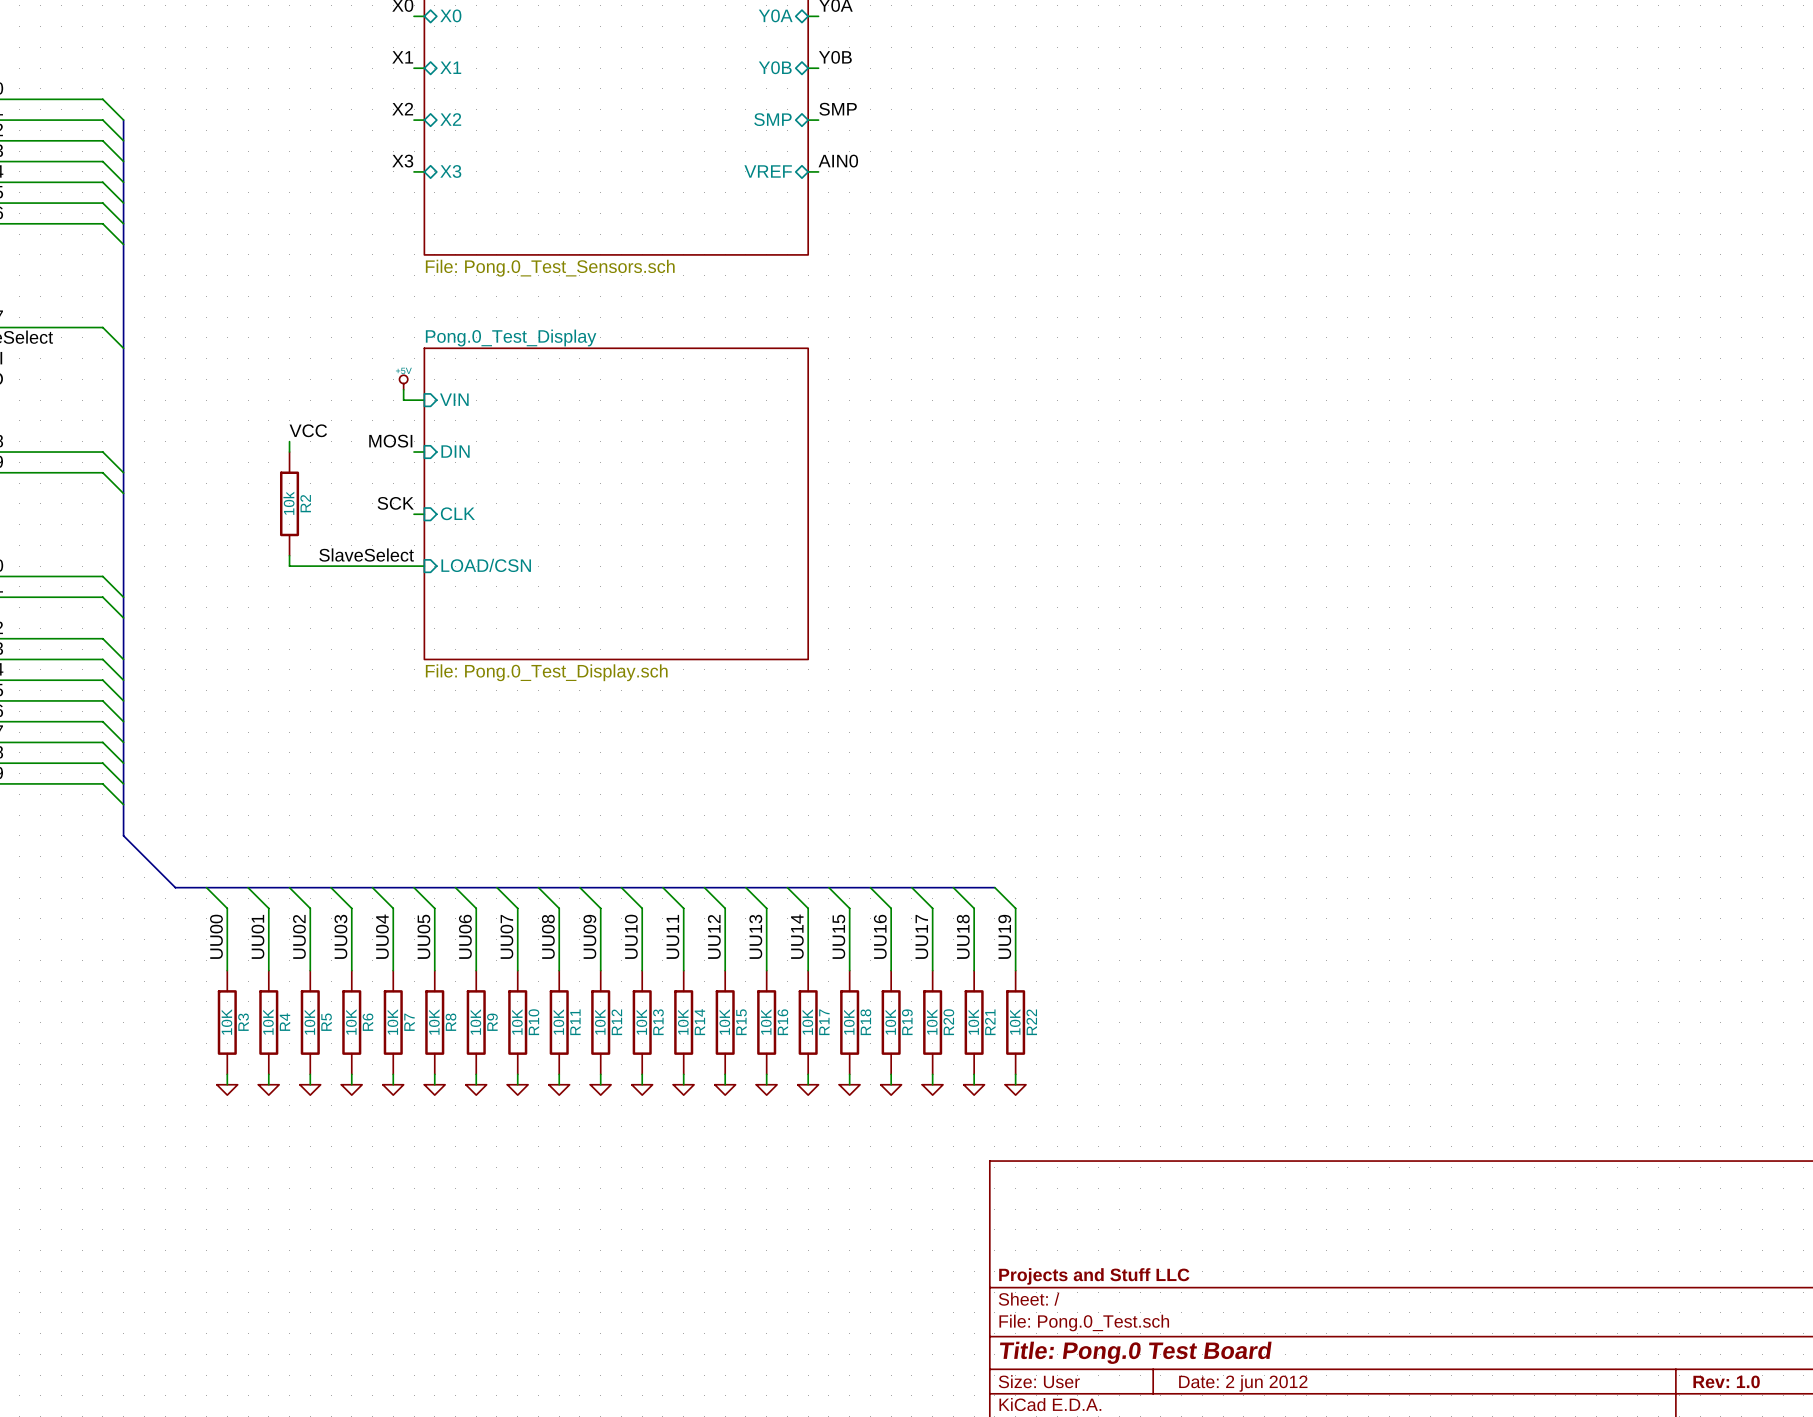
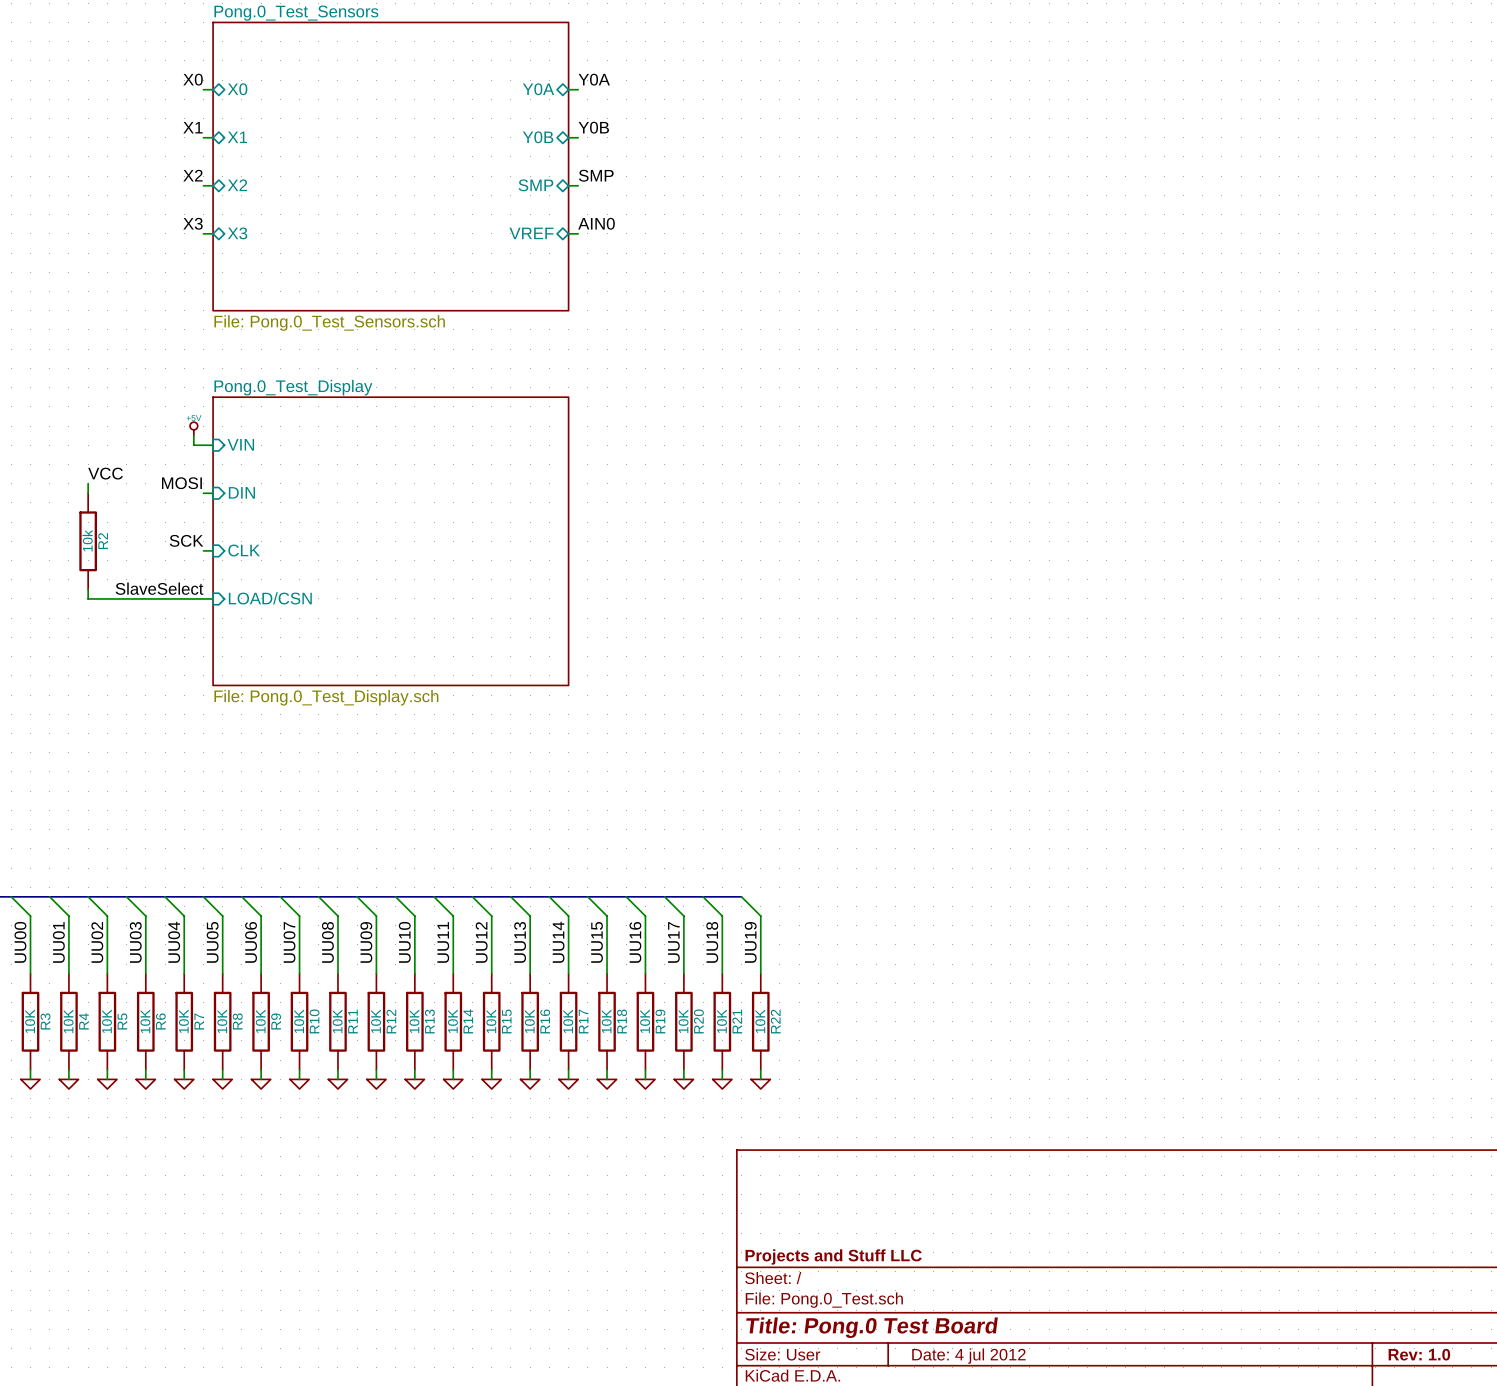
title block: Date: 2 jun 2012 (1243, 1383) -> Date: 4 jul 2012 (968, 1356)

